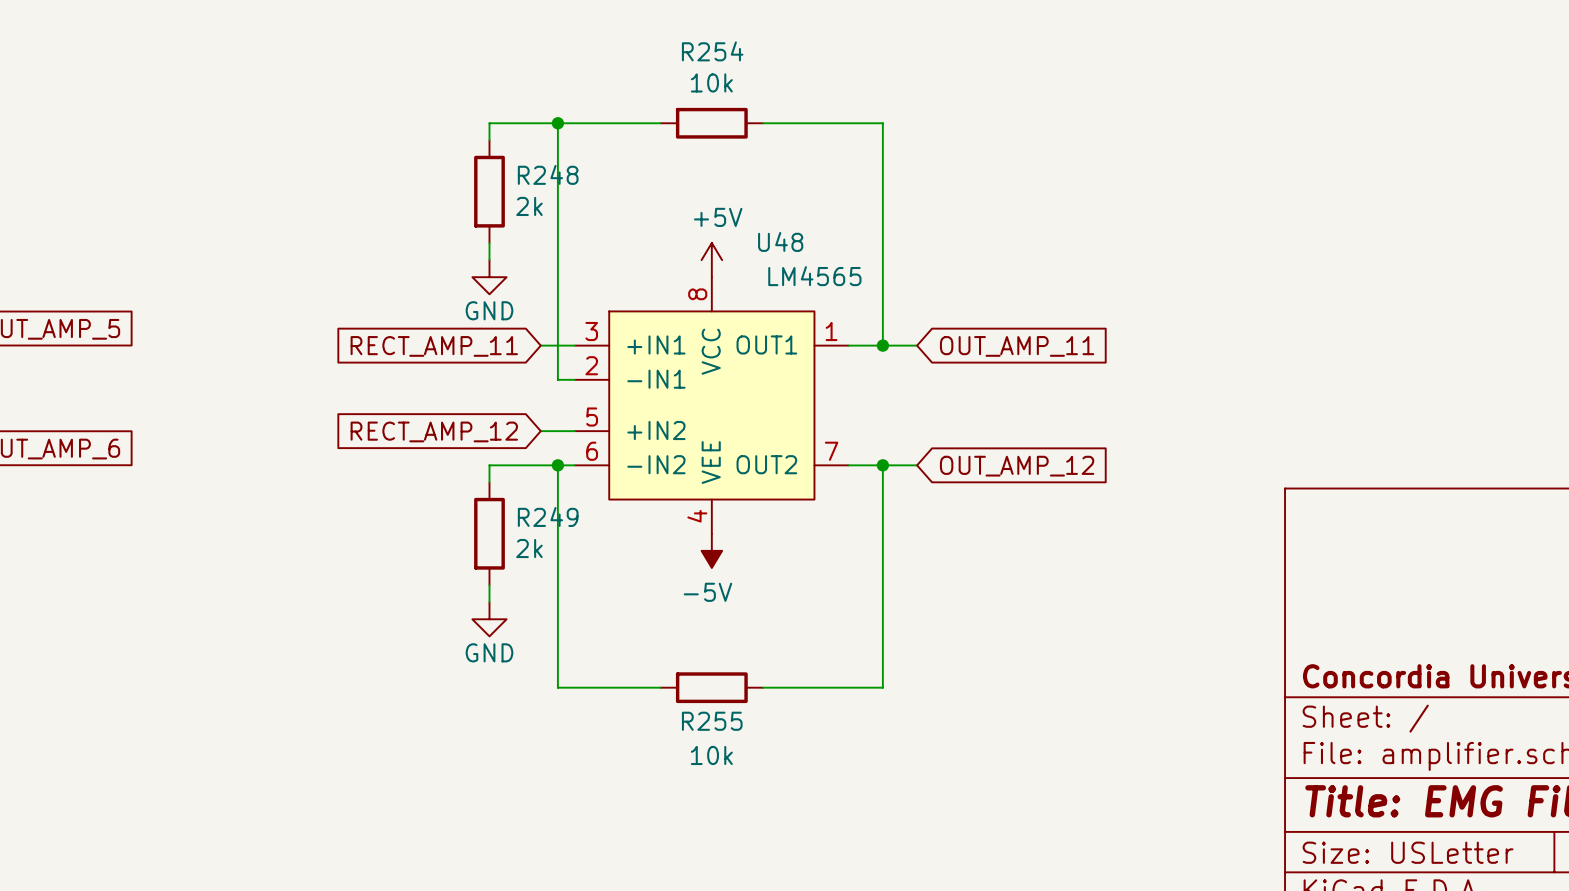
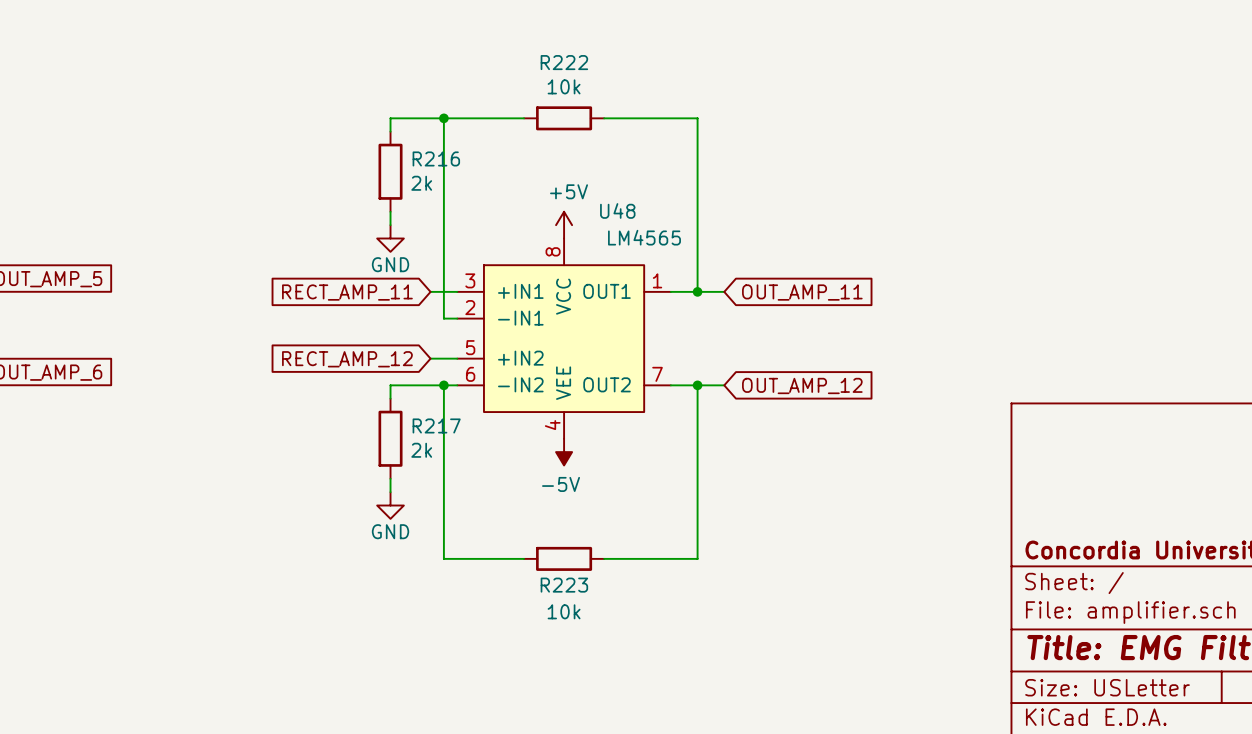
R254 name: R254 (712, 51) -> R222 (564, 62)
R248 name: R248 (548, 174) -> R216 (436, 158)
R249 name: R249 (548, 516) -> R217 (436, 425)
R255 name: R255 (712, 721) -> R223 (564, 585)

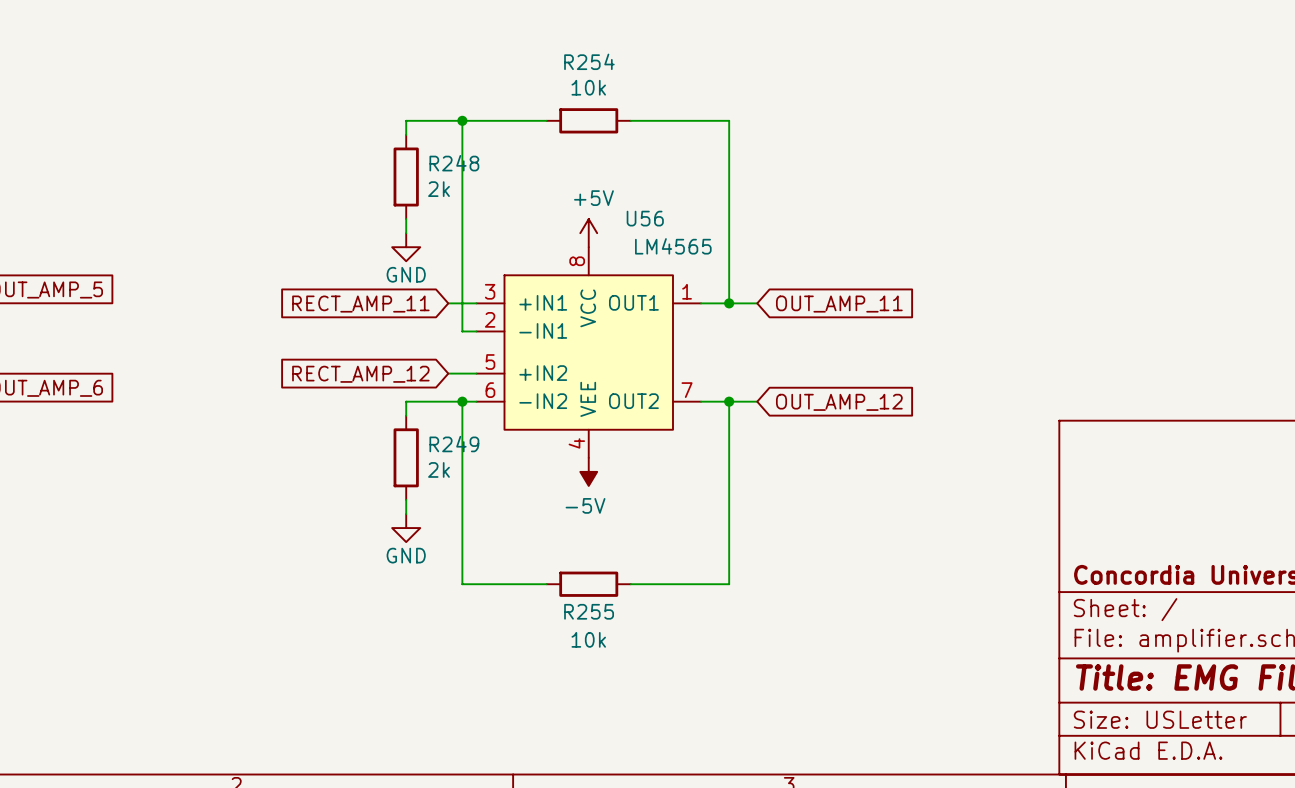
R222 name: R222 (564, 62) -> R254 (589, 61)
R216 name: R216 (436, 158) -> R248 (454, 163)
U48 name: U48 (617, 210) -> U56 (645, 218)
R217 name: R217 (436, 425) -> R249 (454, 444)
R223 name: R223 (564, 585) -> R255 (589, 611)

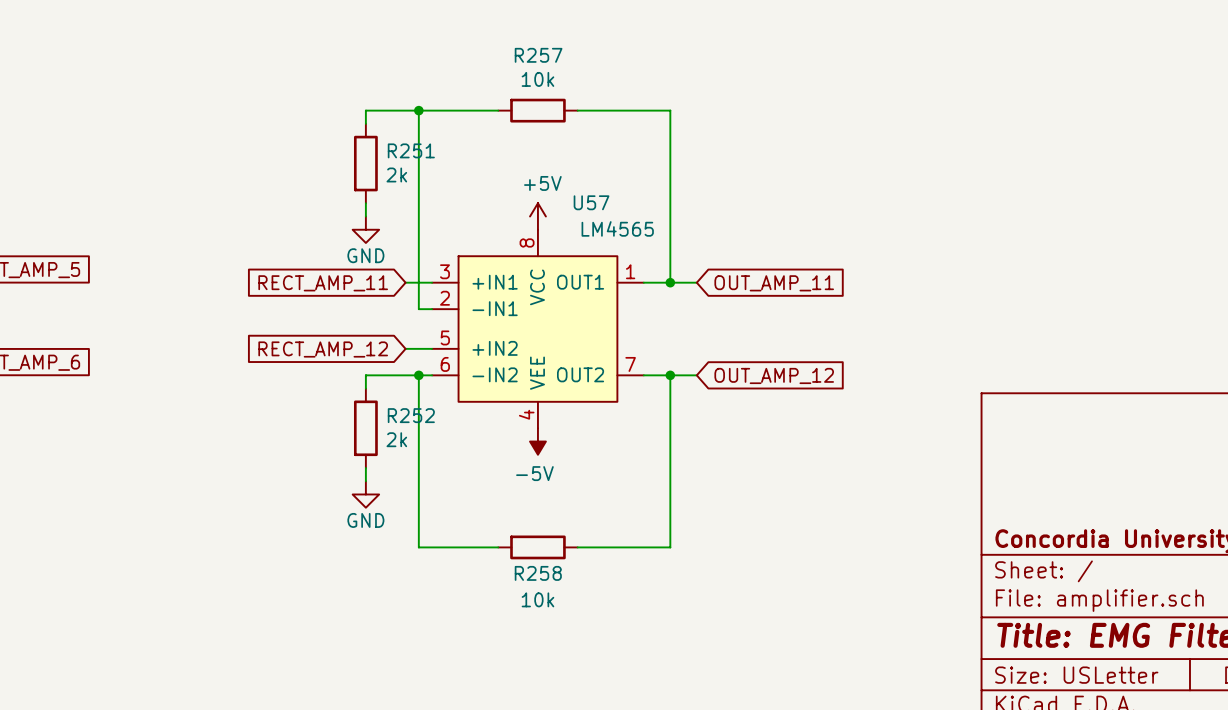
R254 name: R254 (589, 61) -> R257 (538, 55)
R248 name: R248 (454, 163) -> R251 (411, 150)
U56 name: U56 (645, 218) -> U57 (591, 202)
R249 name: R249 (454, 444) -> R252 (411, 415)
R255 name: R255 (589, 611) -> R258 (538, 573)

